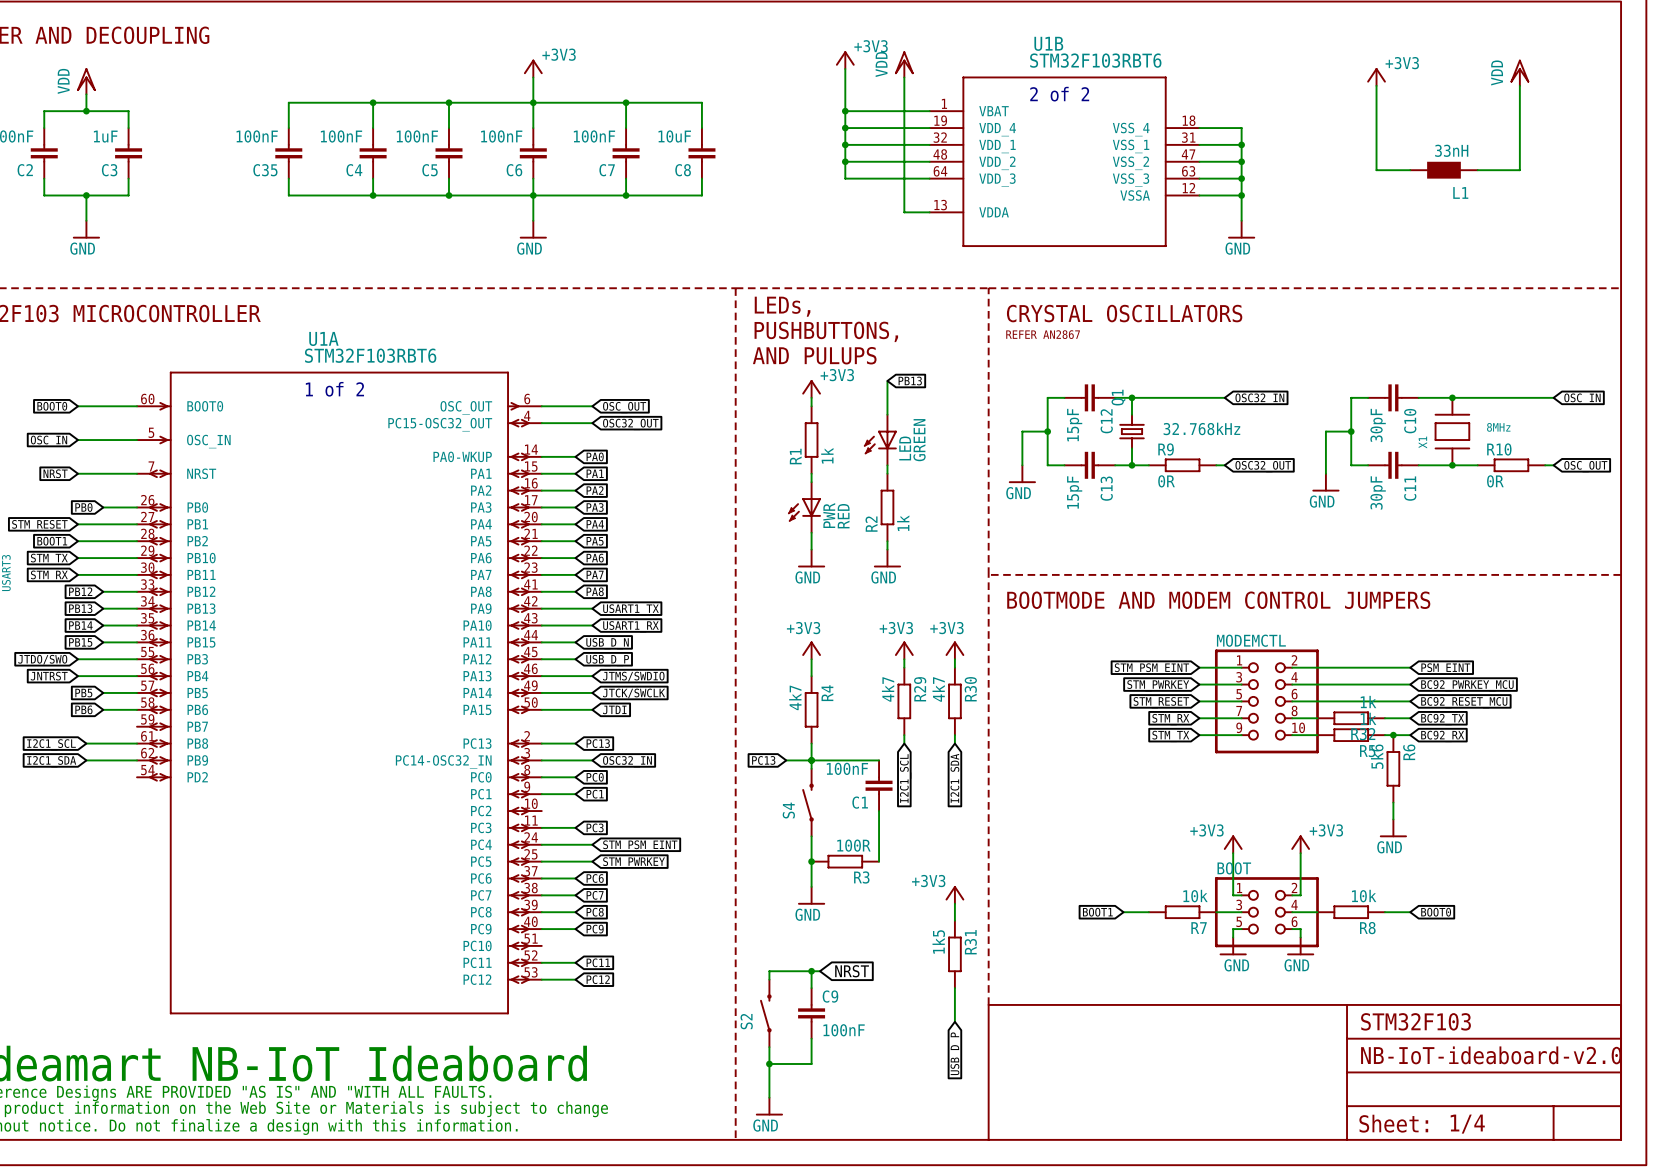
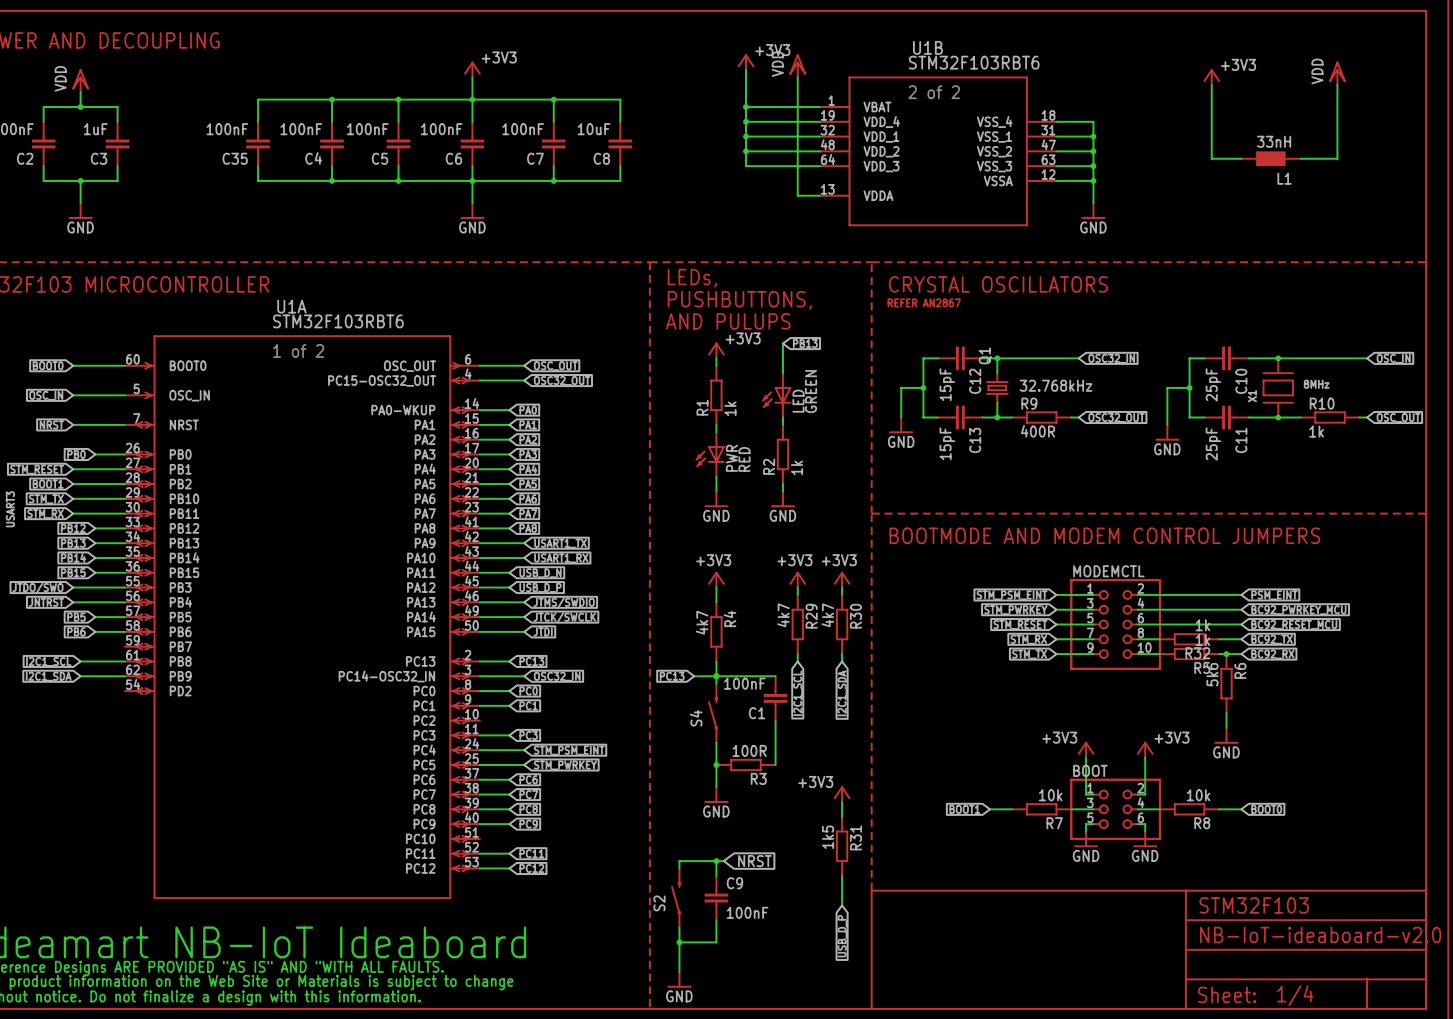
C10 value: 30pF (1378, 425) -> 25pF (1213, 384)
R9 value: 0R (1166, 481) -> 400R (1038, 431)
R10 value: 0R (1495, 481) -> 1k (1316, 431)
C11 value: 30pF (1378, 492) -> 25pF (1213, 444)

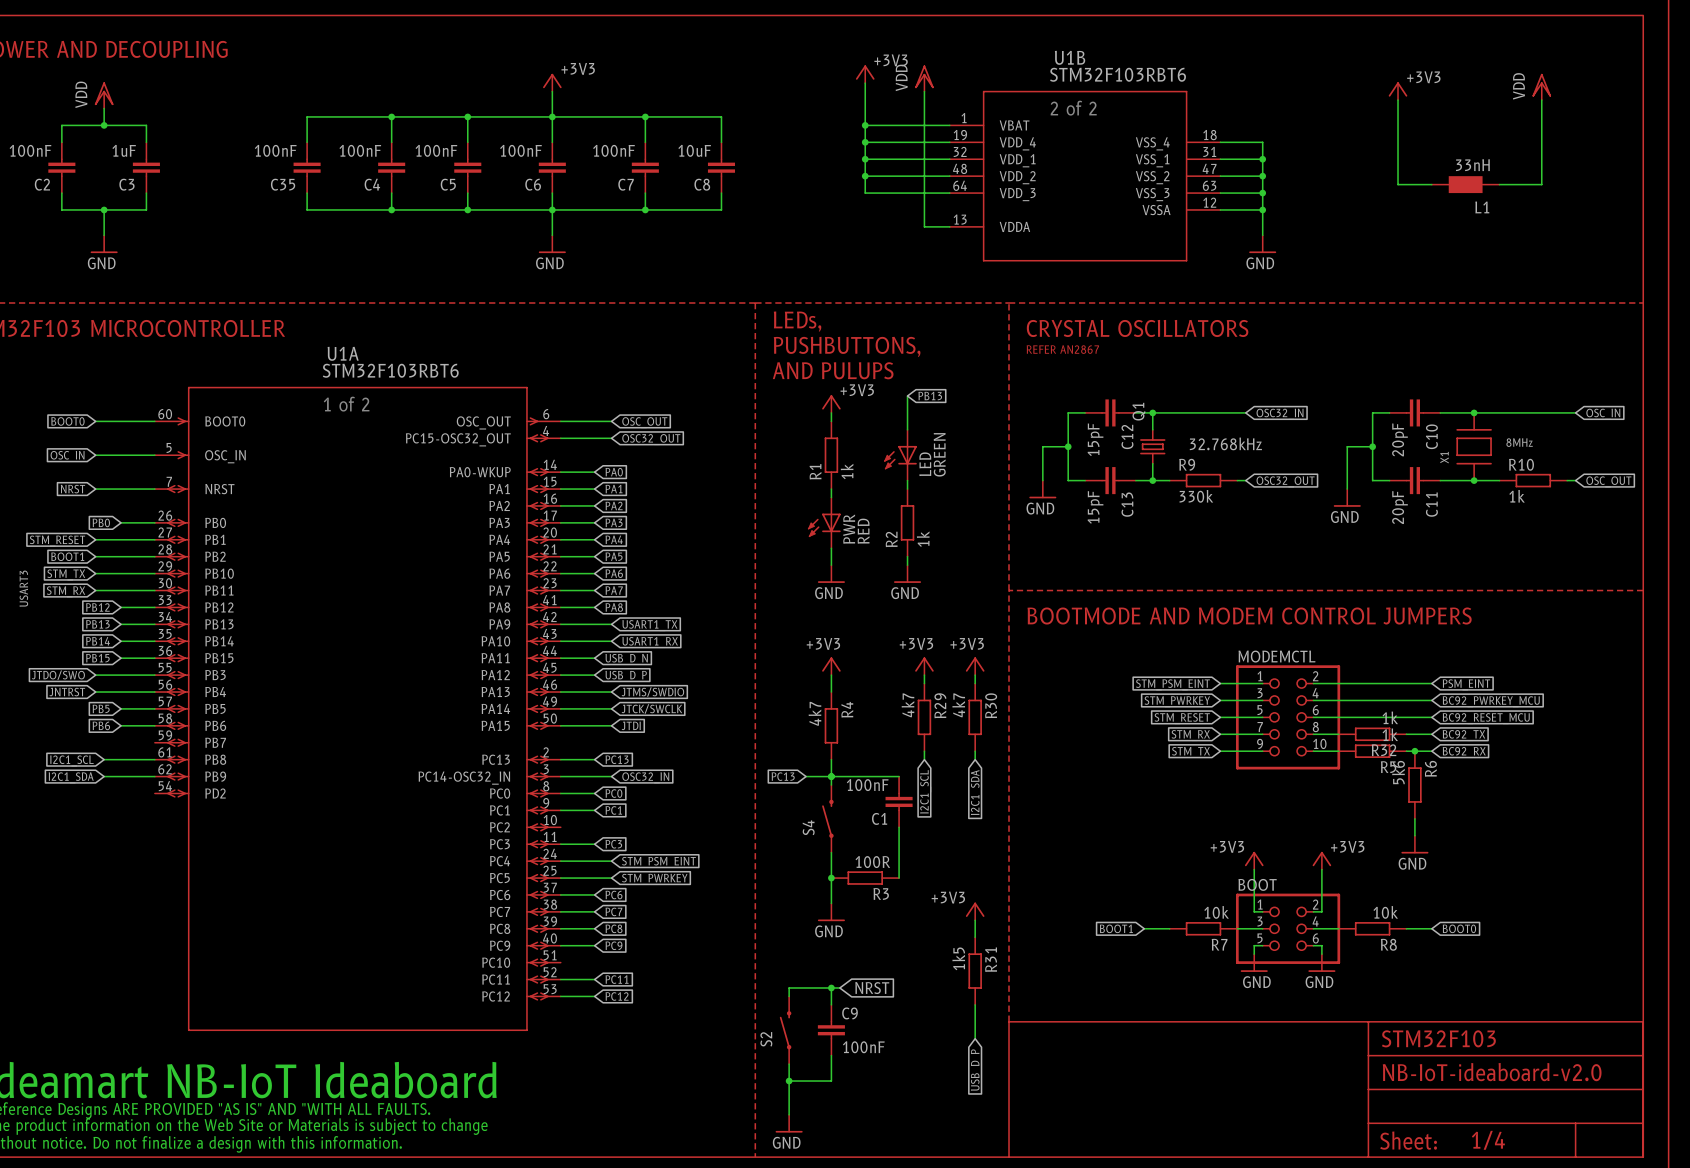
C10 value: 25pF (1213, 384) -> 20pF (1399, 439)
R9 value: 400R (1038, 431) -> 330k (1196, 496)
C11 value: 25pF (1213, 444) -> 20pF (1399, 507)

